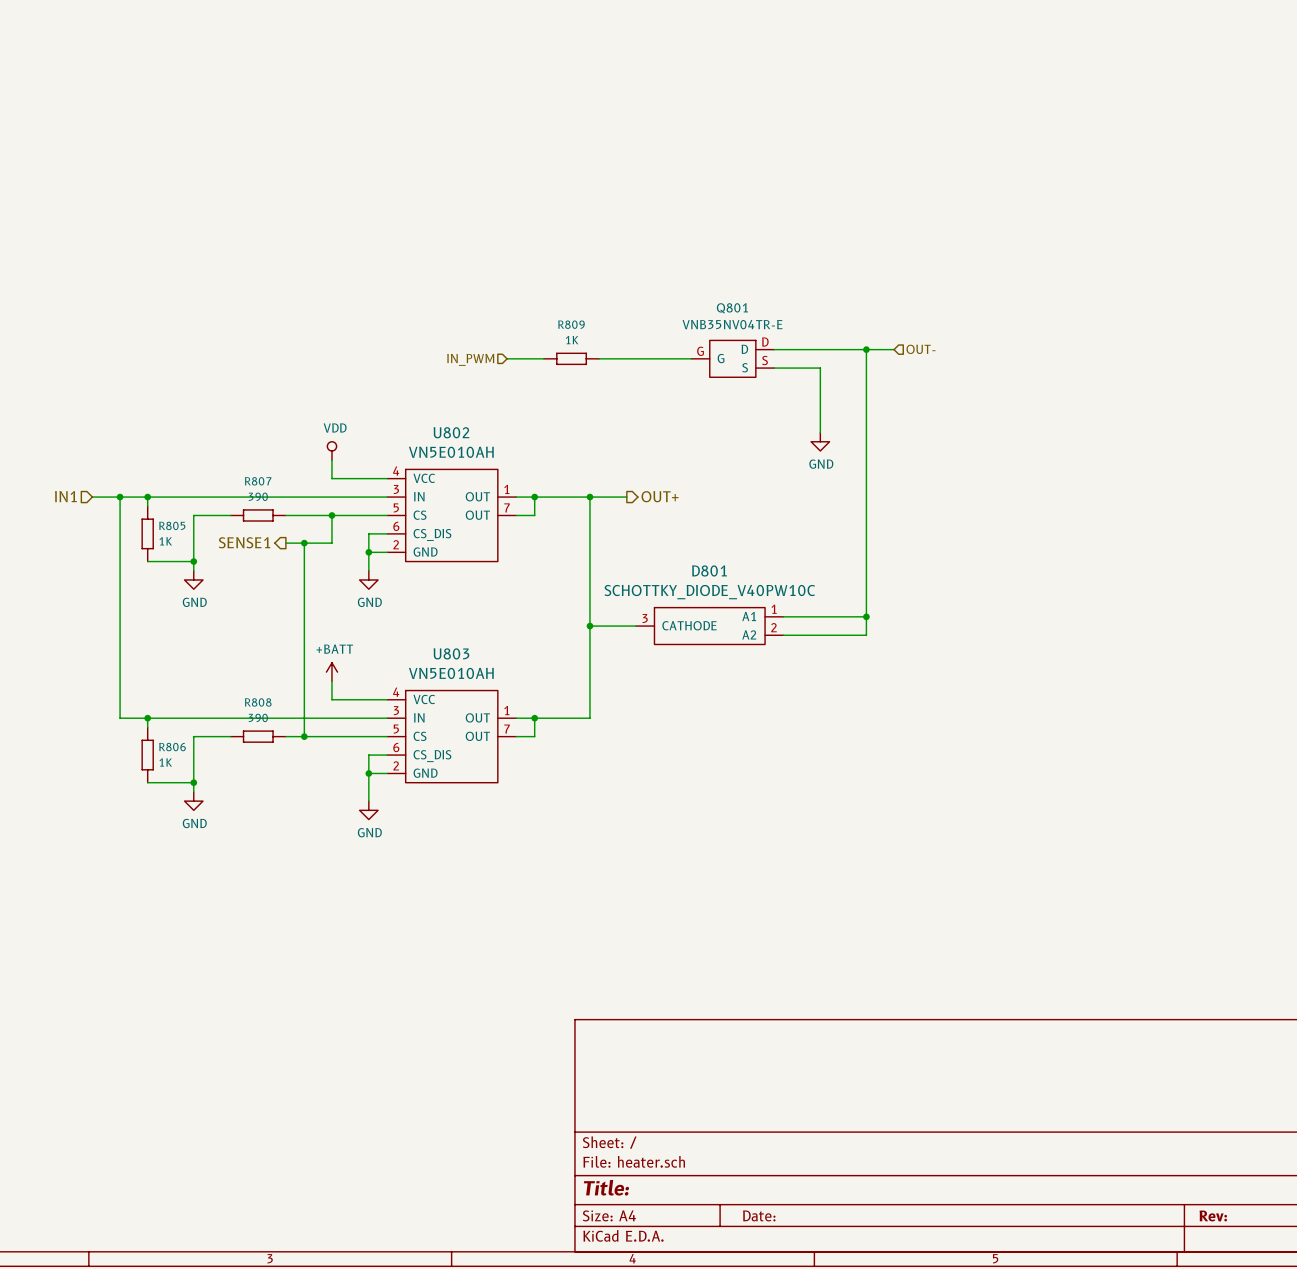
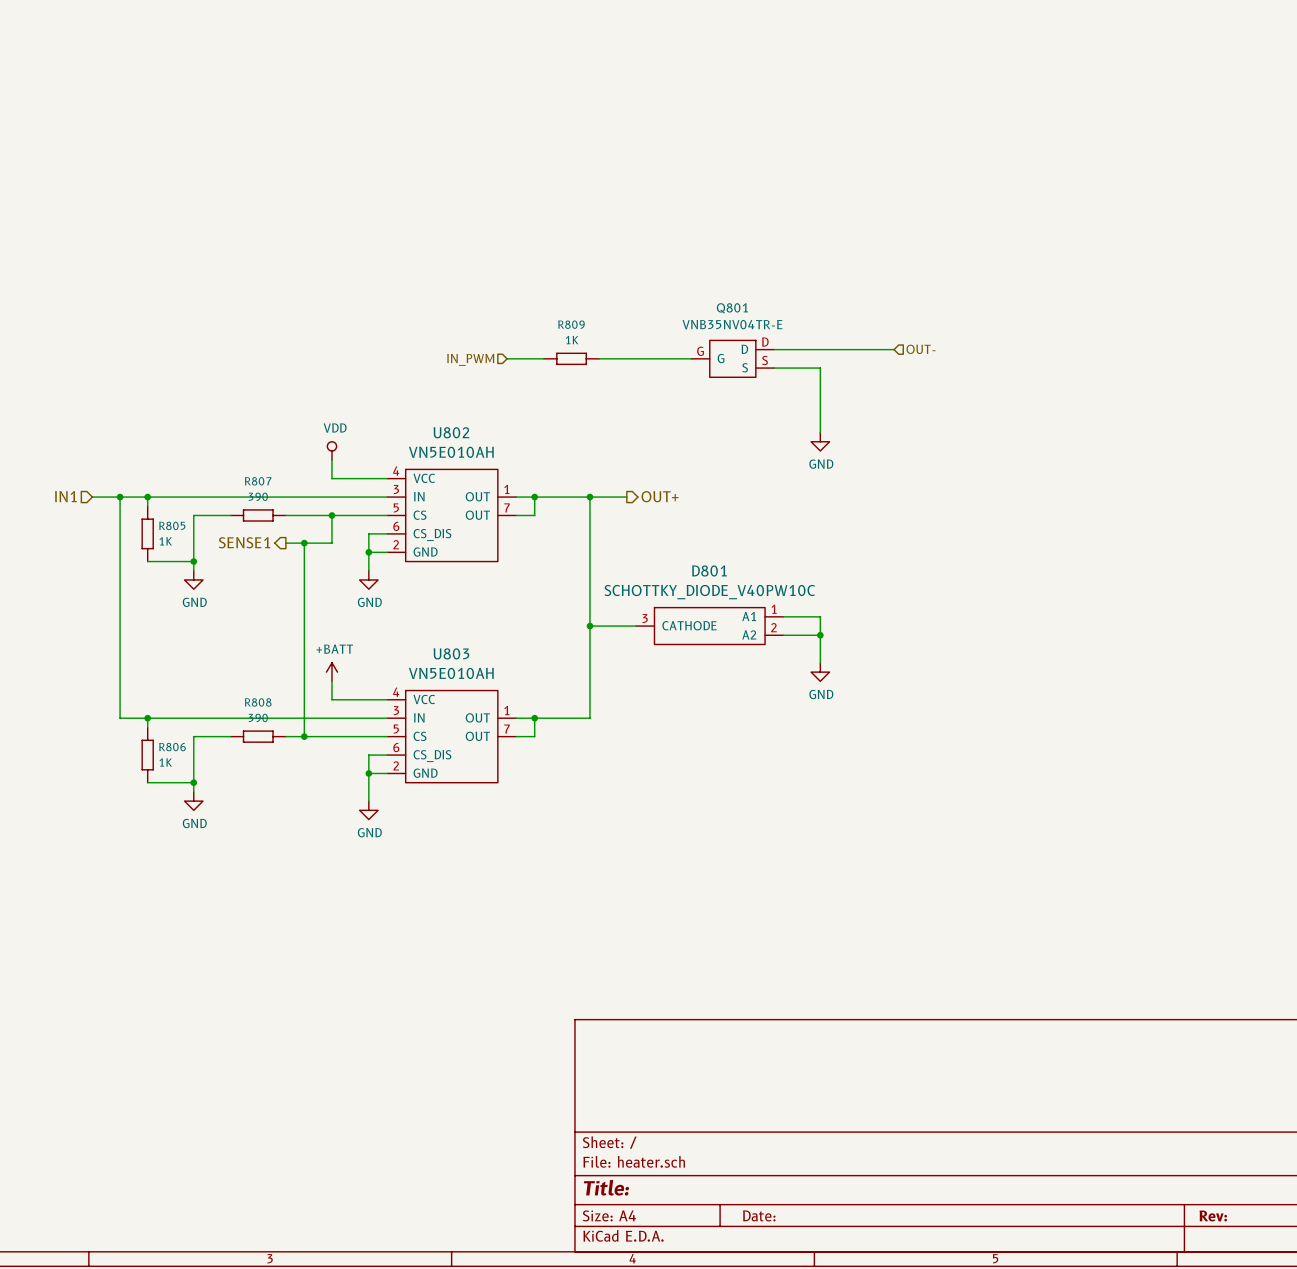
wire: (866, 349) (866, 635) (820, 635) -> none
junction: (866, 349) -> none
wire: (820, 616) (866, 616) -> (820, 616) (820, 662)
junction: (866, 616) -> none
junction: none -> (820, 635)
power symbol: none -> GND (820, 672)

